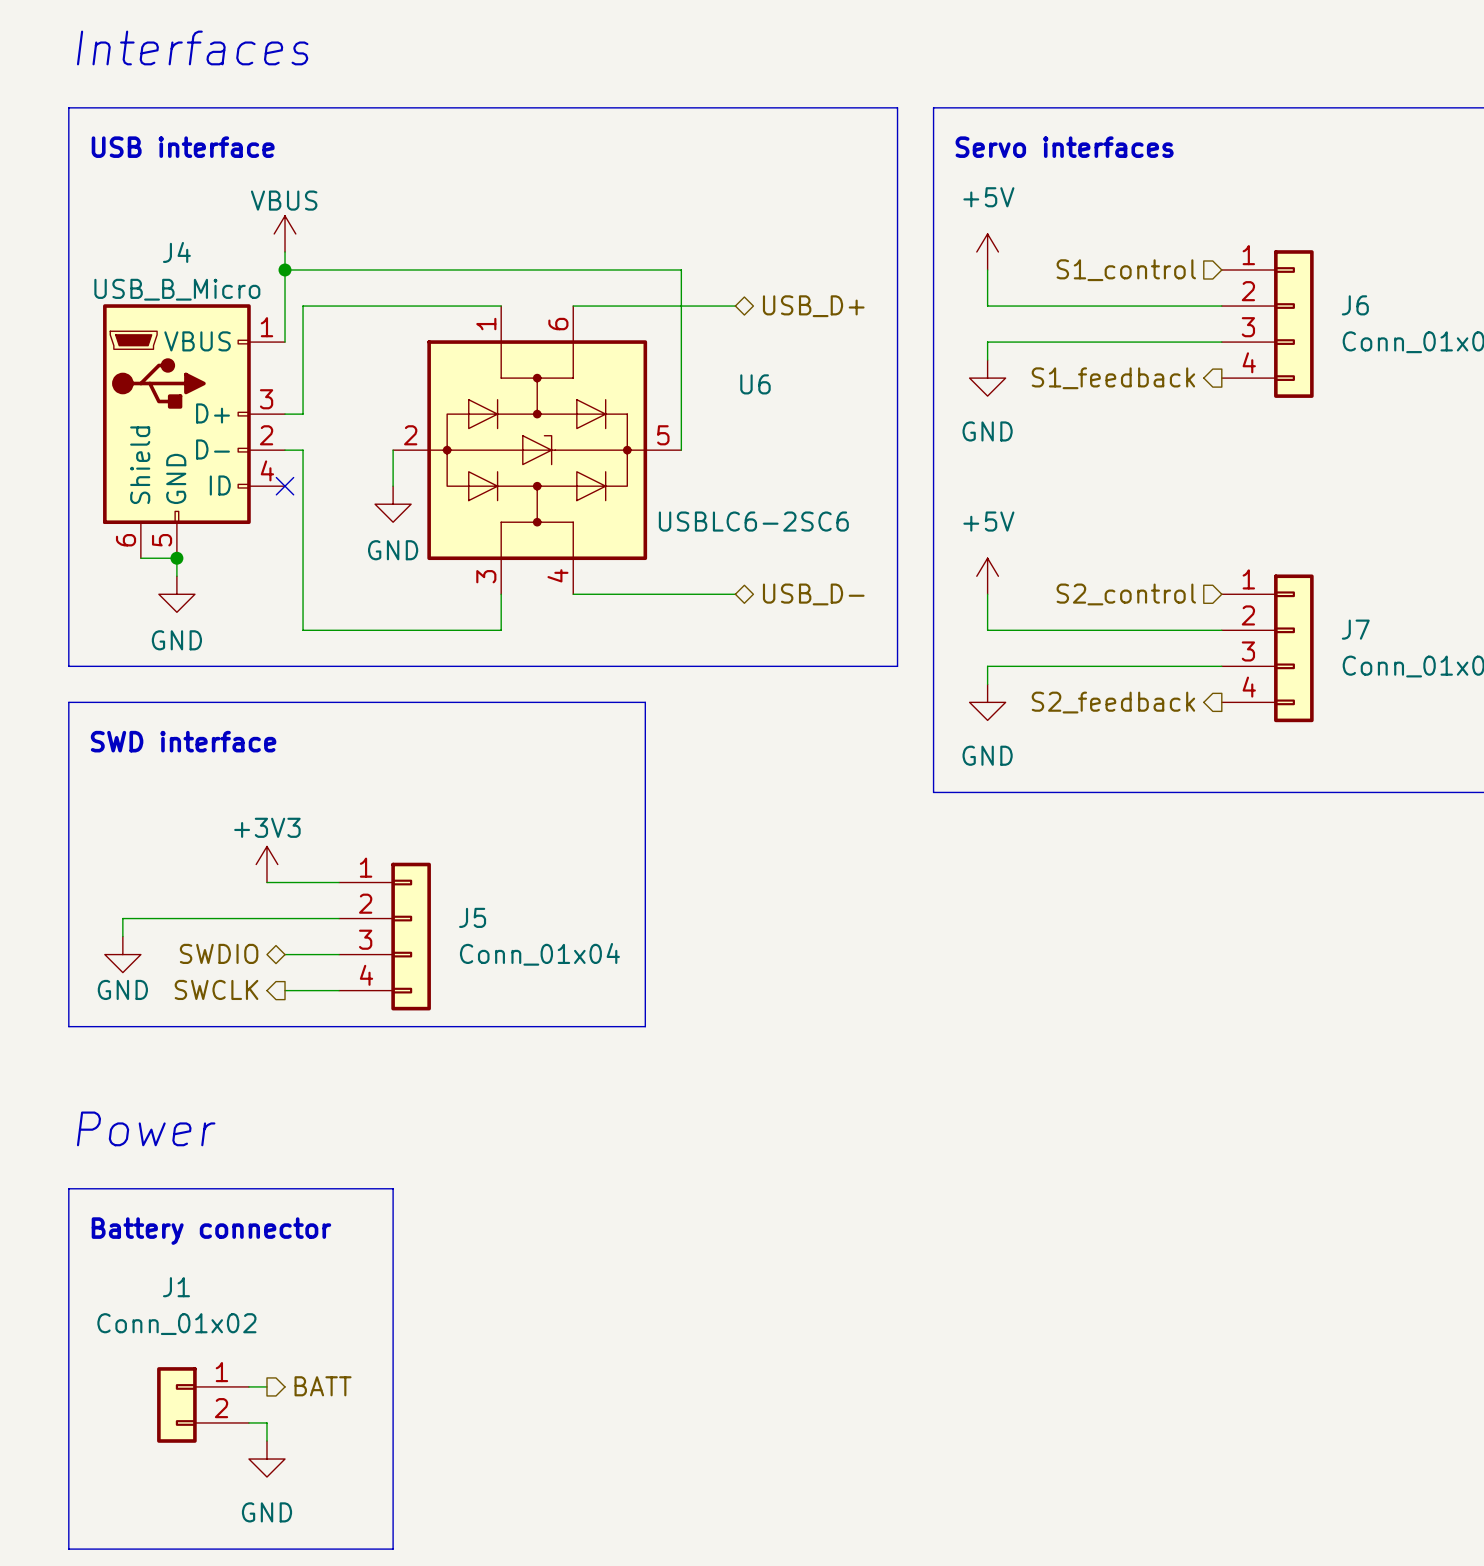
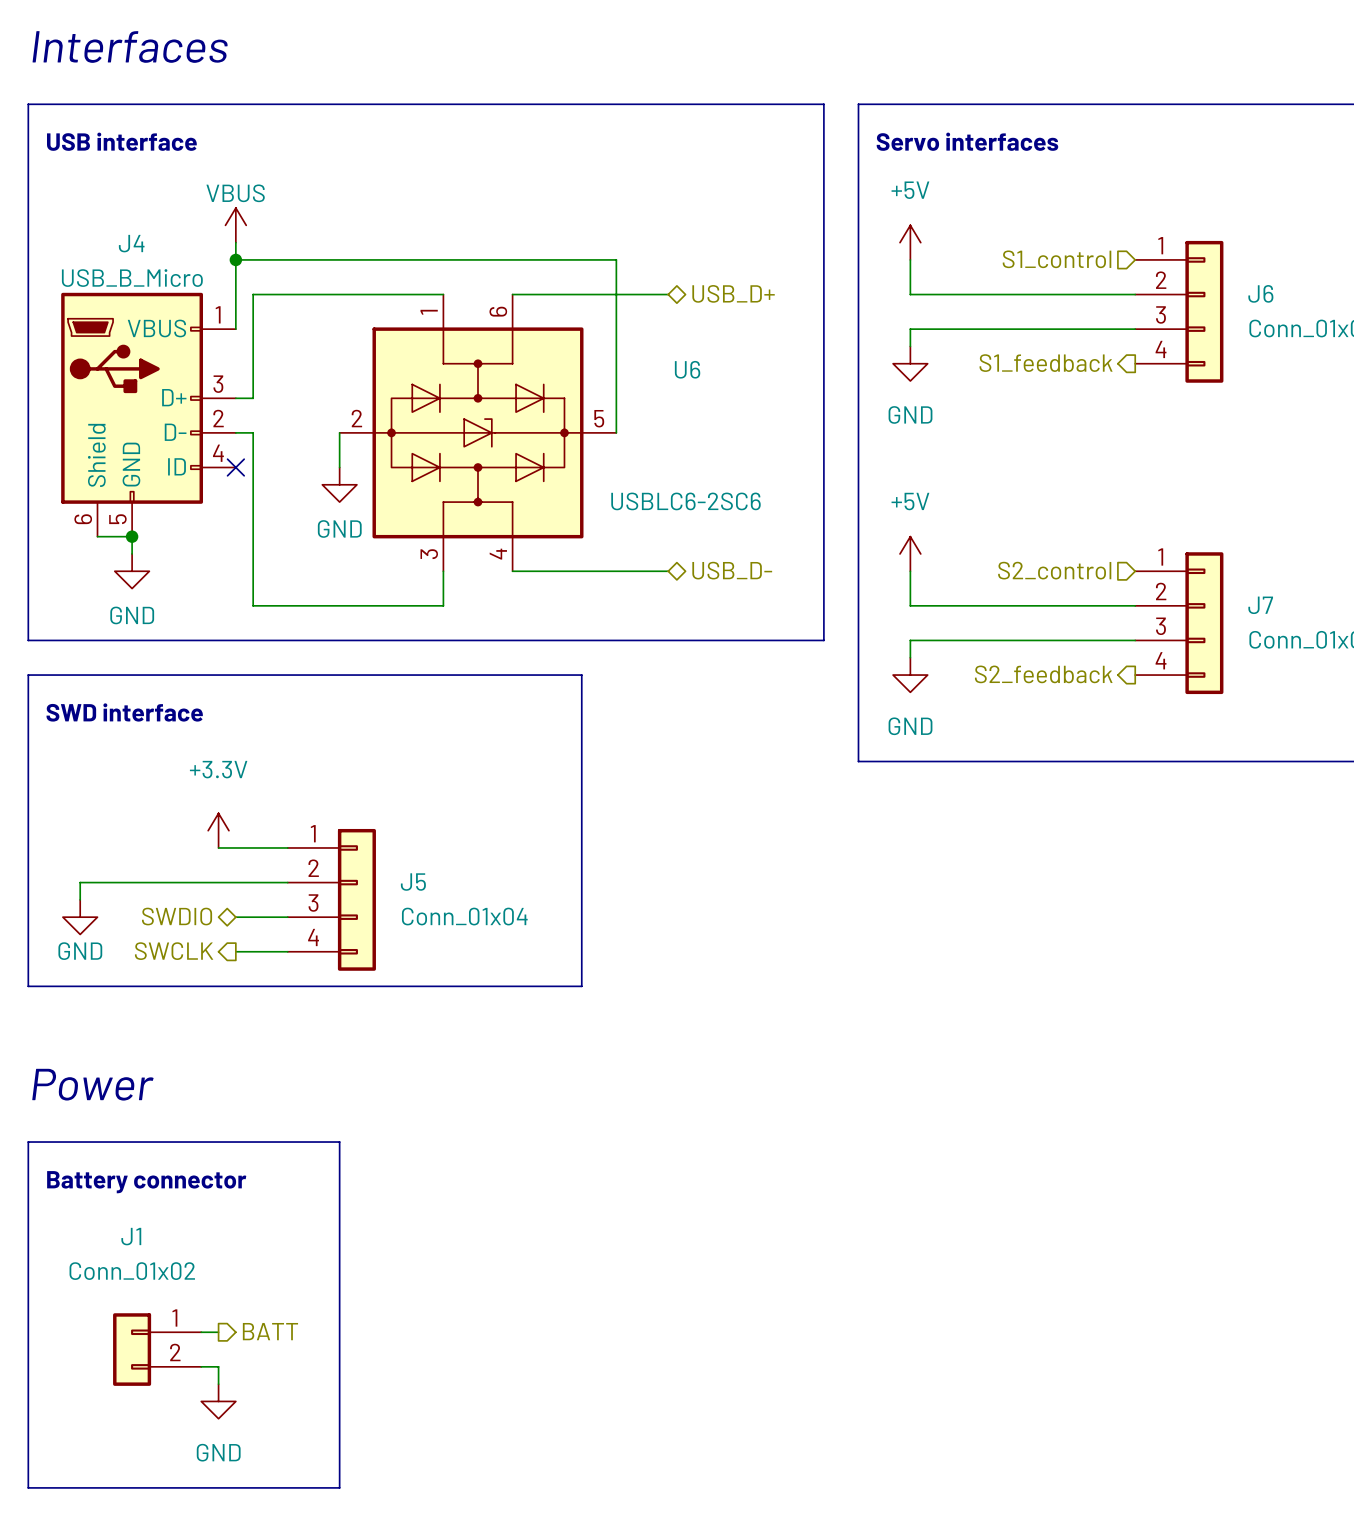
power symbol: +3V3 (266, 864) -> +3.3V (218, 830)

